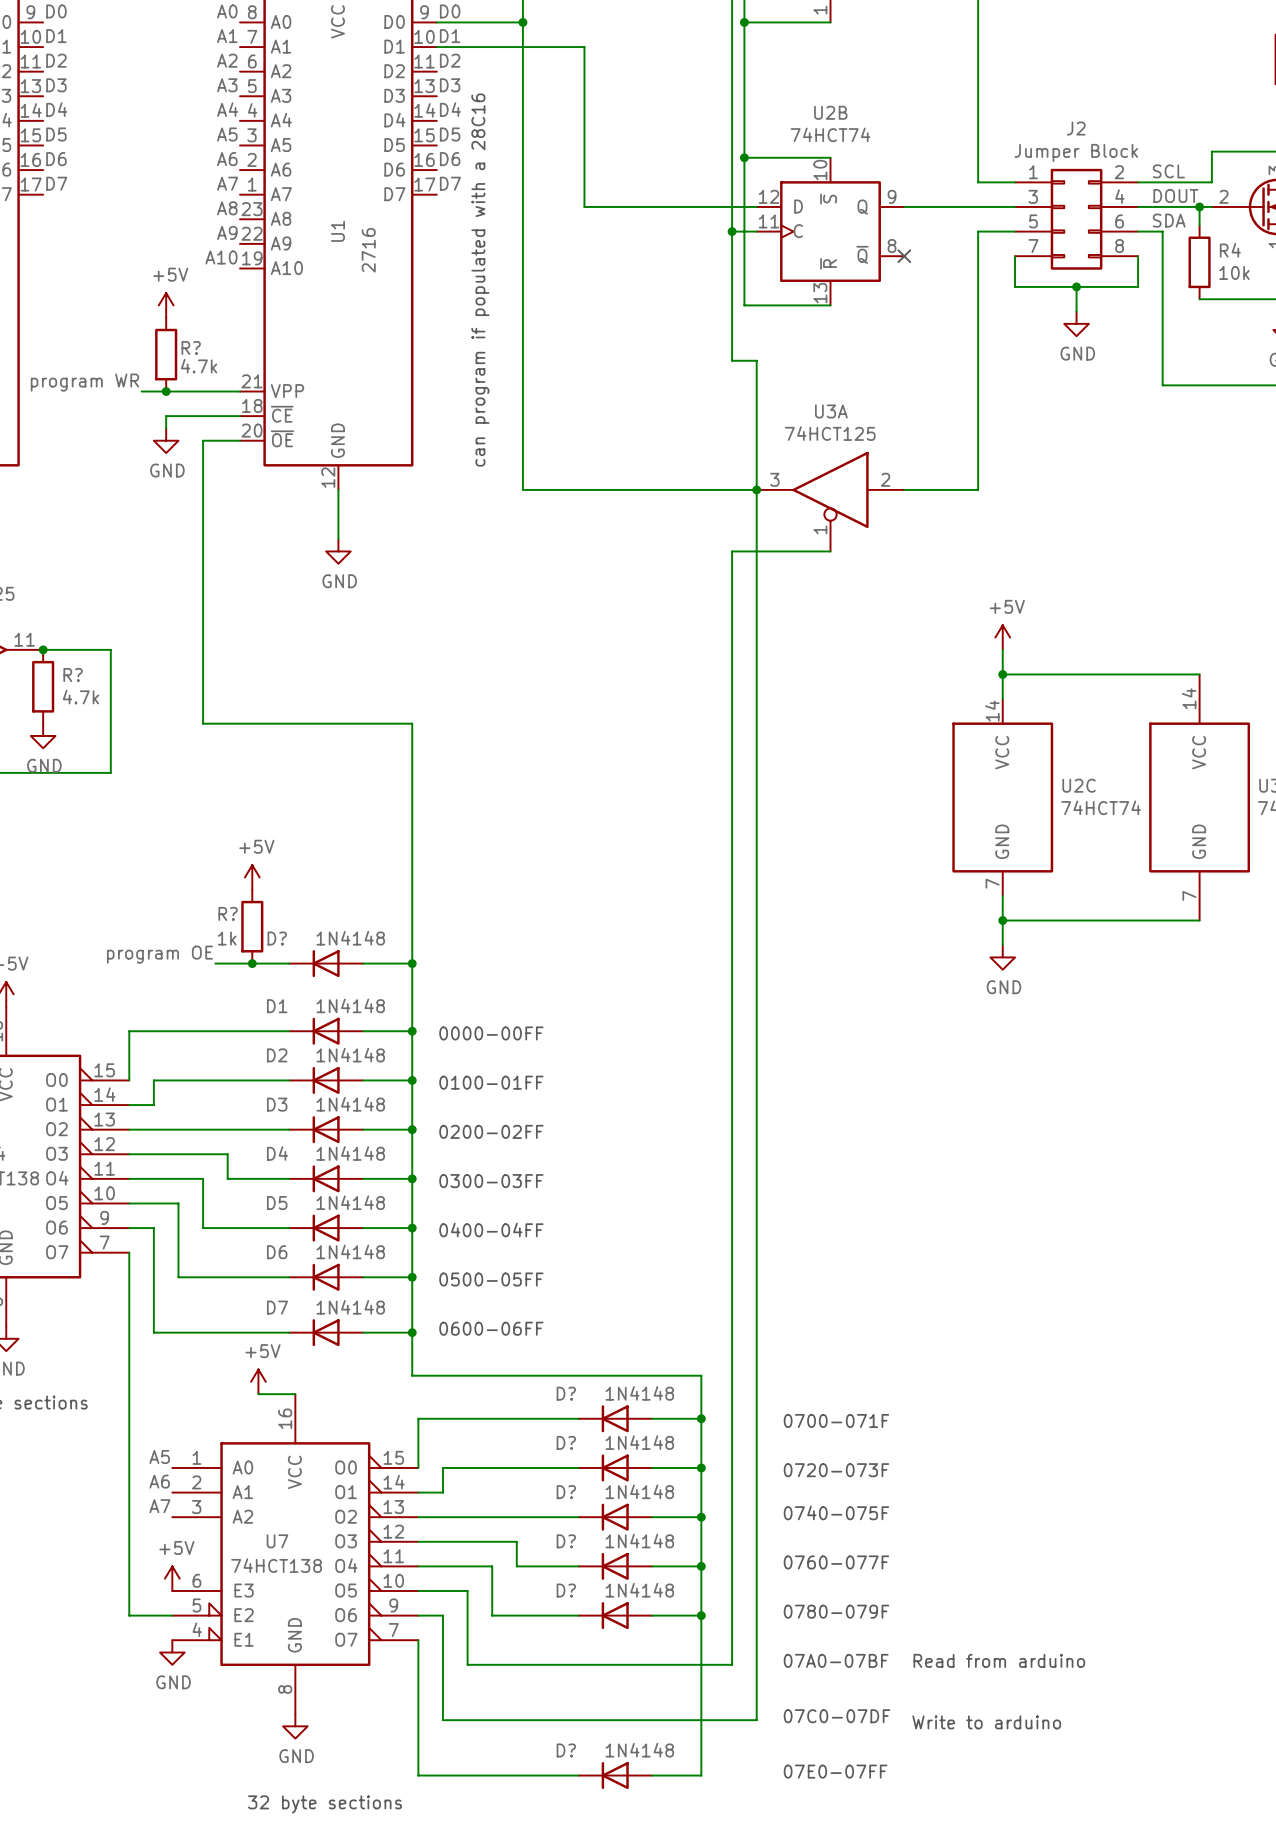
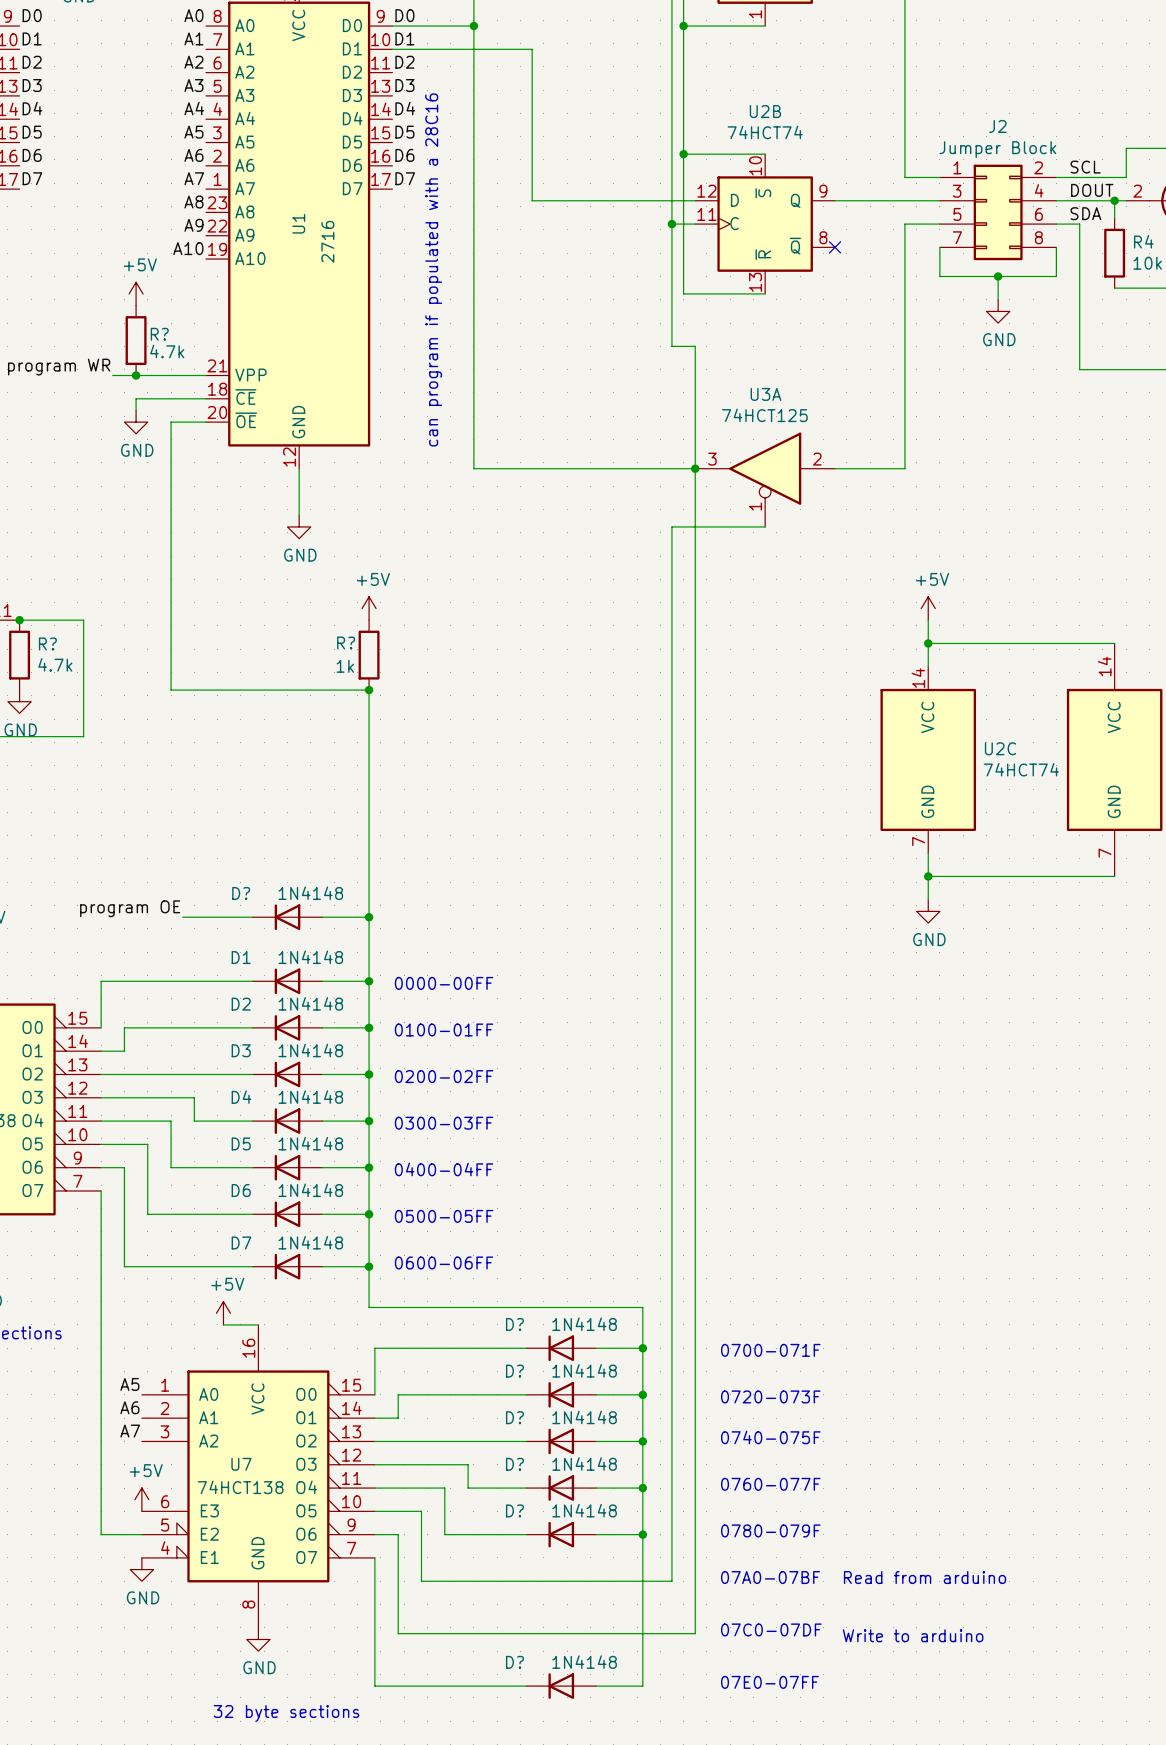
power symbol: none -> +5V (369, 608)
R?: none -> 1k (369, 655)
junction: none -> (369, 690)
power symbol: +5V (252, 877) -> none
R?: 1k (252, 926) -> none
junction: (252, 963) -> none

